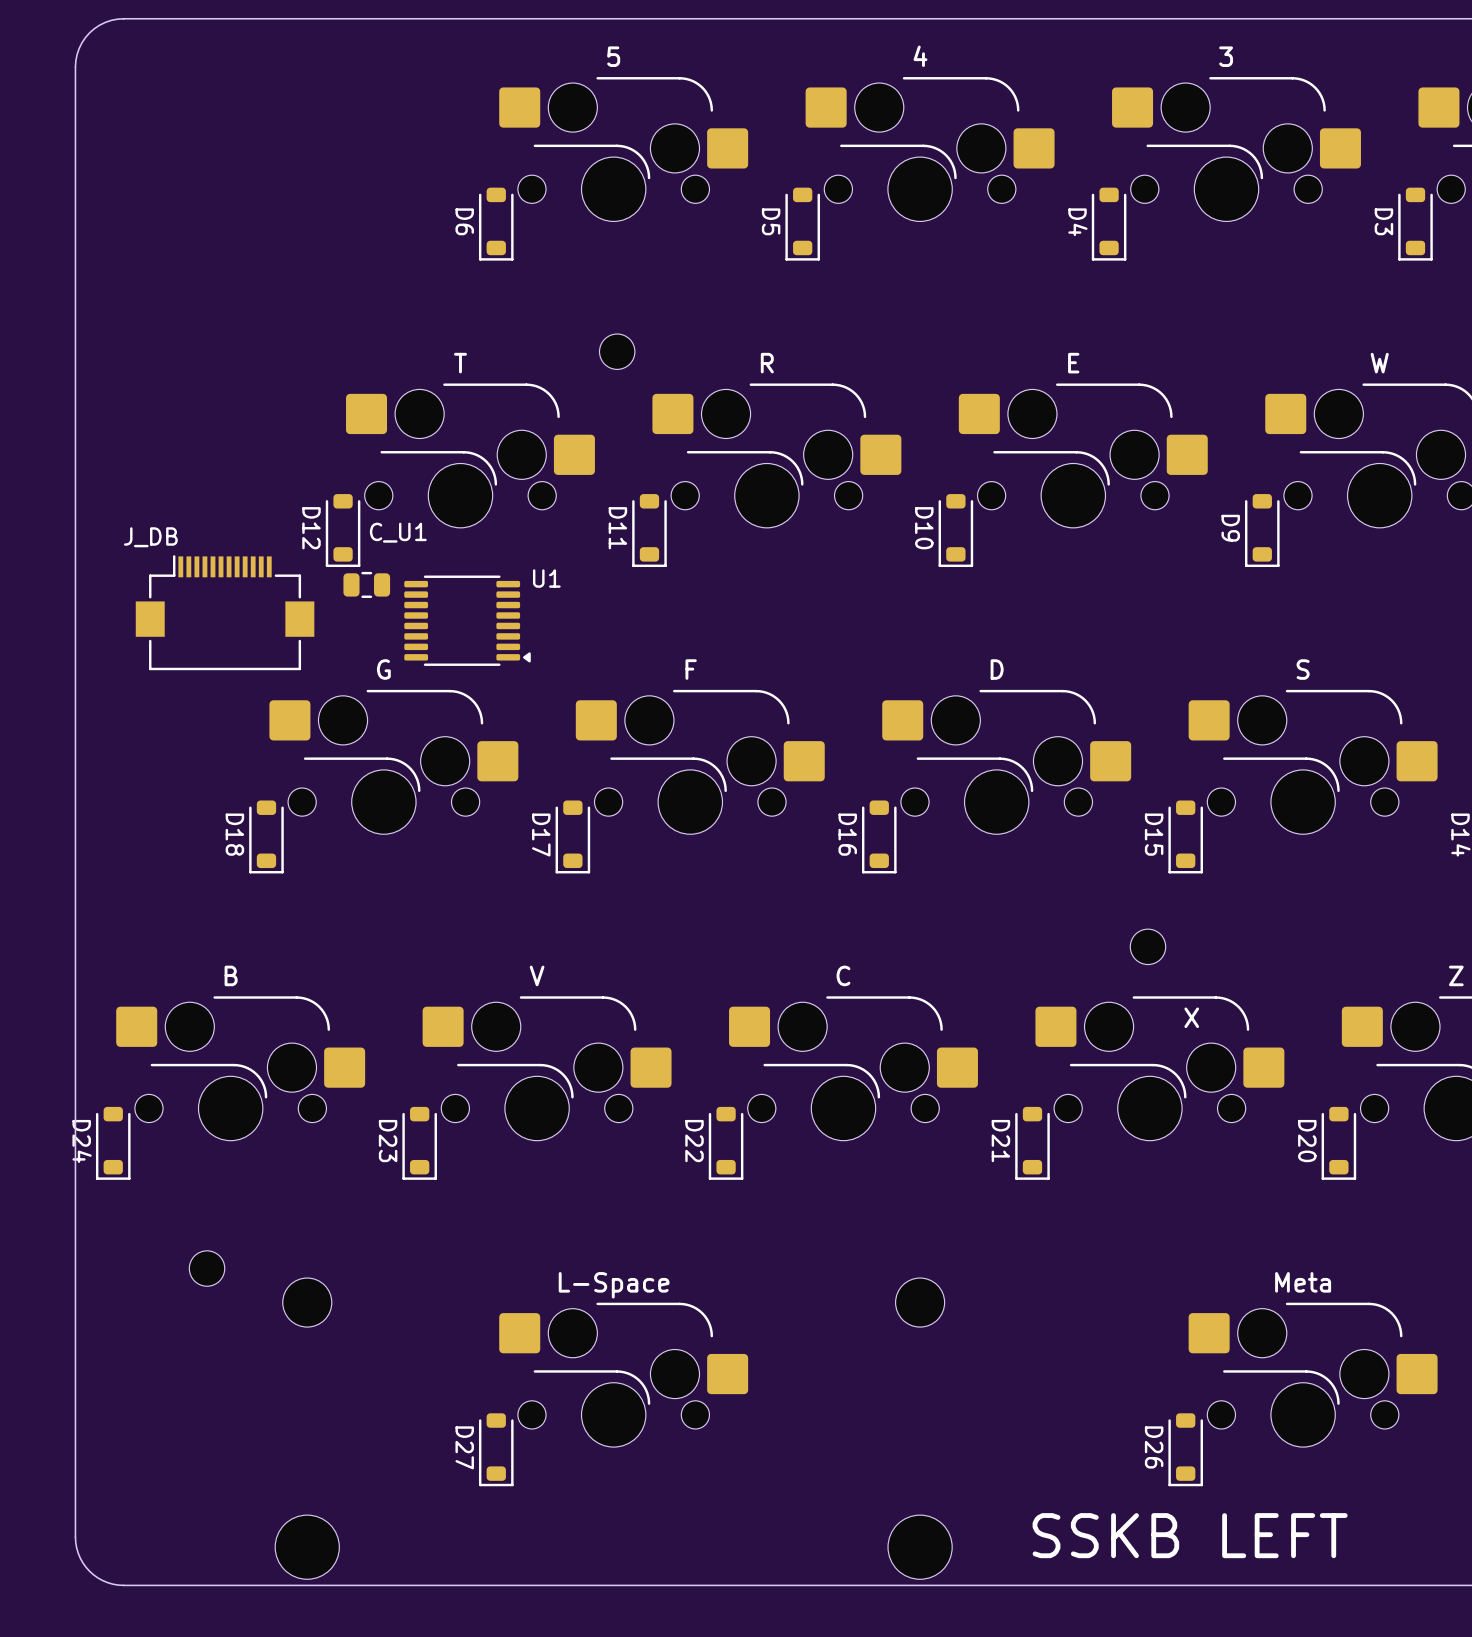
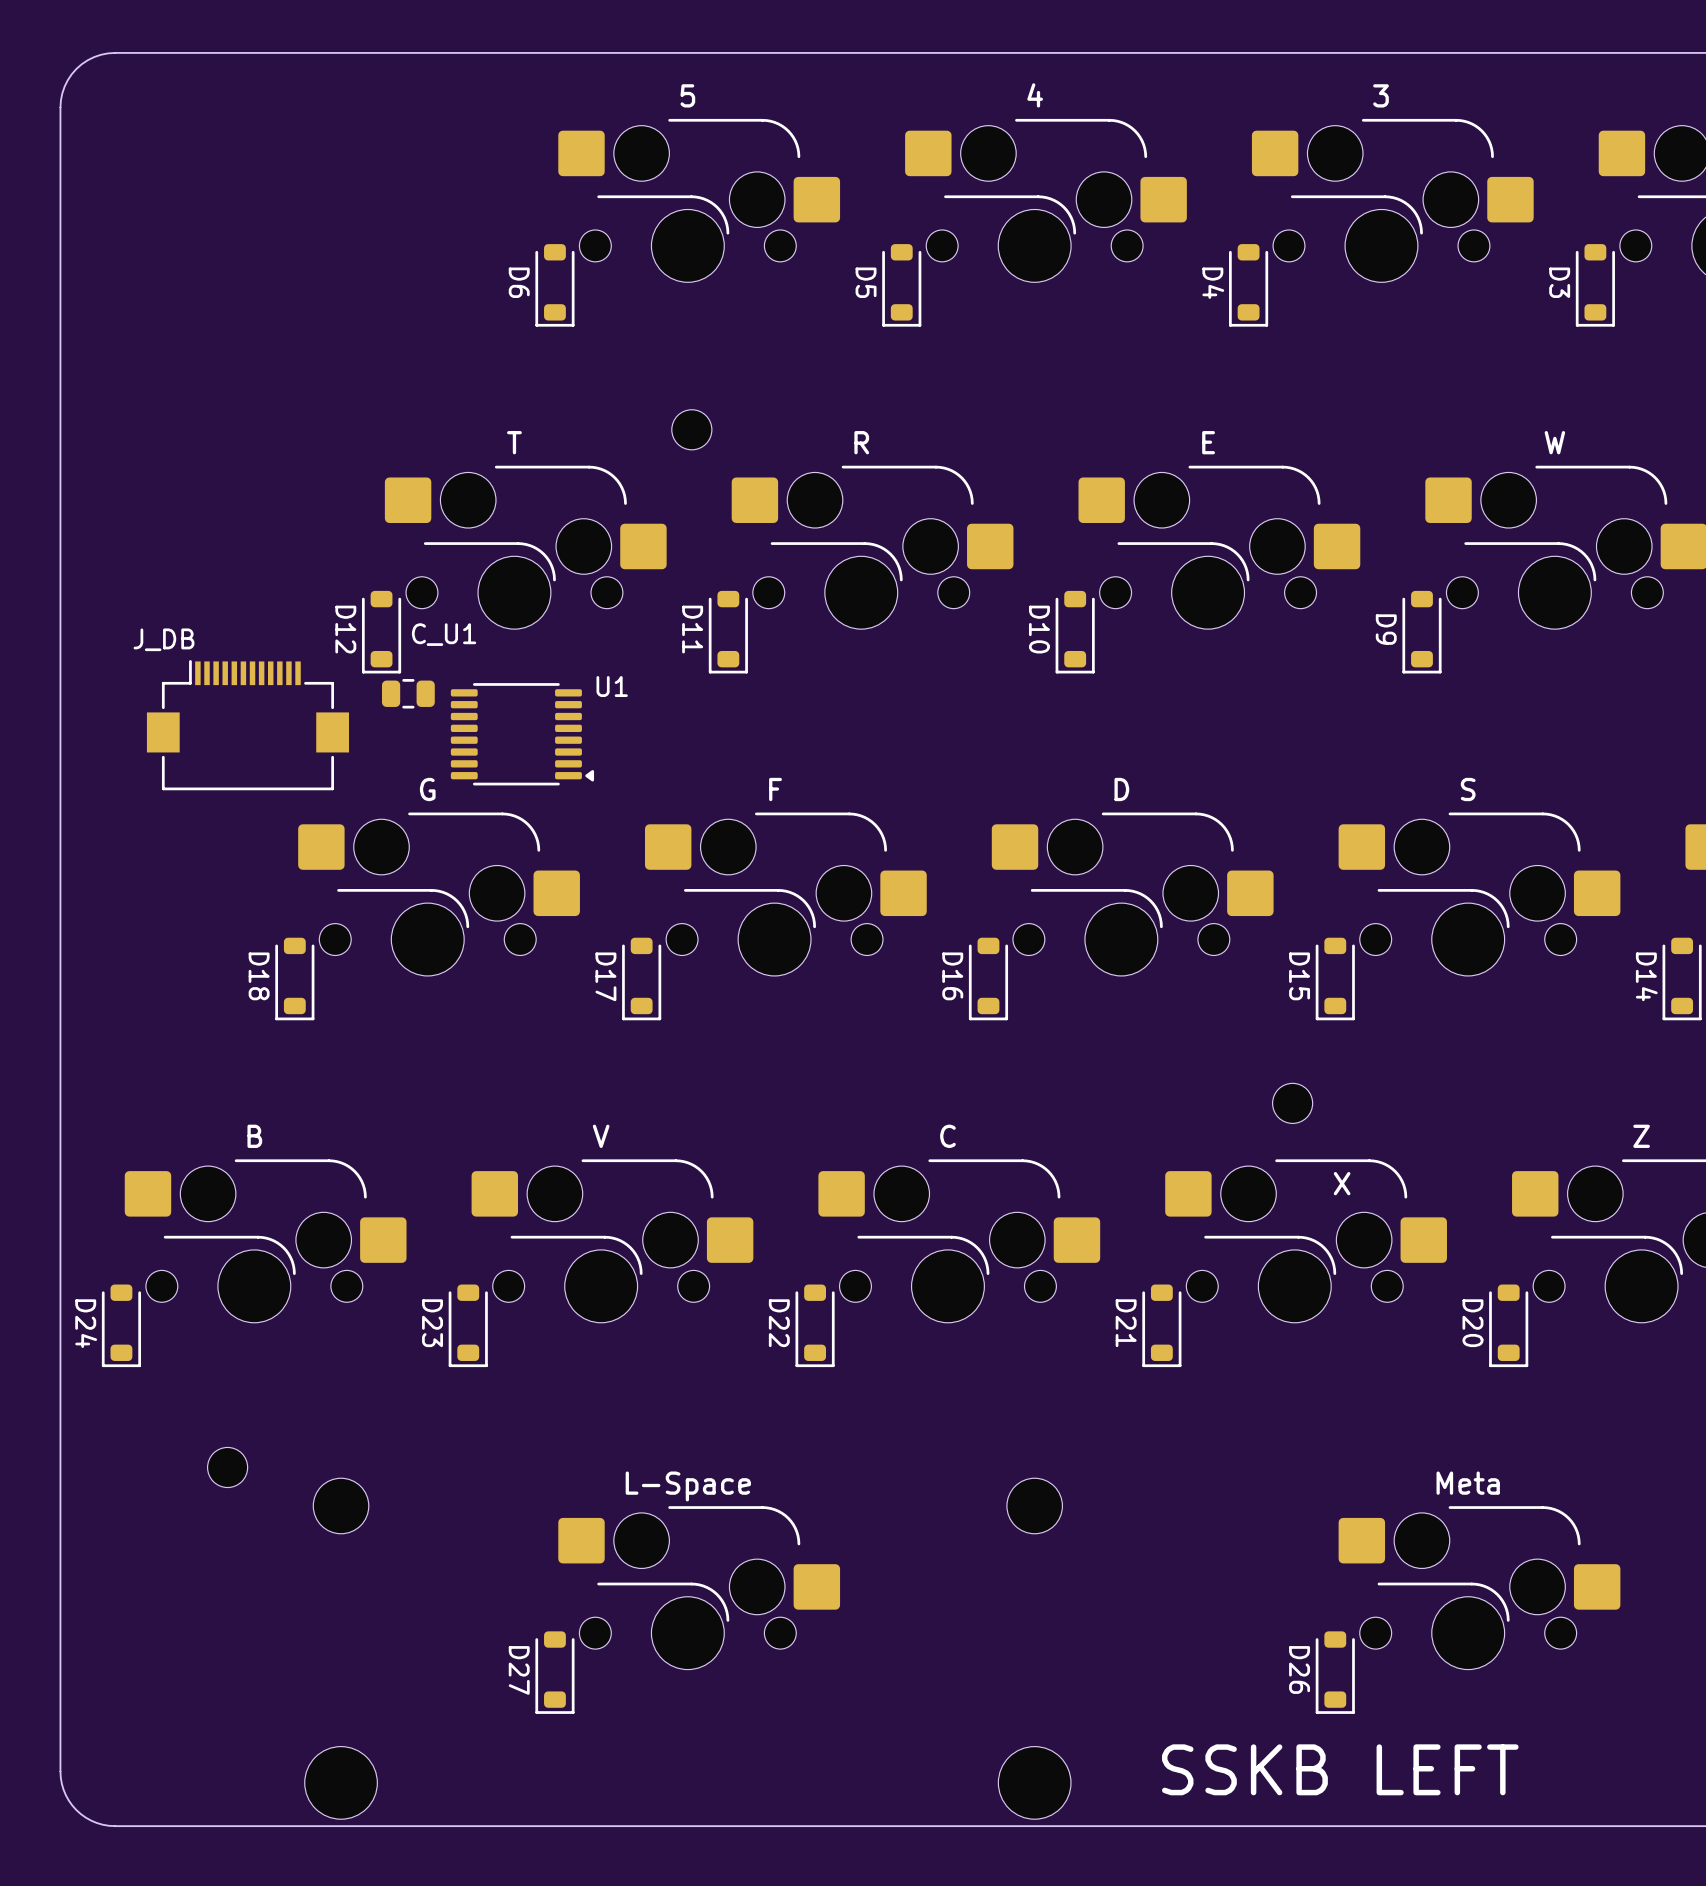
board edge: (123, 18) (105, 22) (89, 32) (79, 48) (75, 67) (75, 1537) (78, 1553) (89, 1571) (107, 1582) (123, 1585) -> (133, 52) (100, 54) (81, 64) (71, 74) (64, 86) (60, 107) (60, 1771) (65, 1795) (81, 1814) (102, 1824) (133, 1826)

